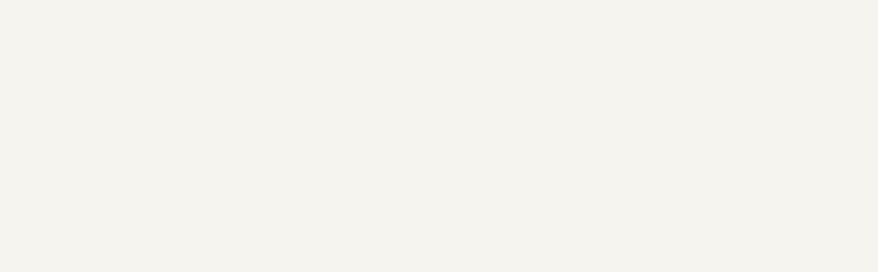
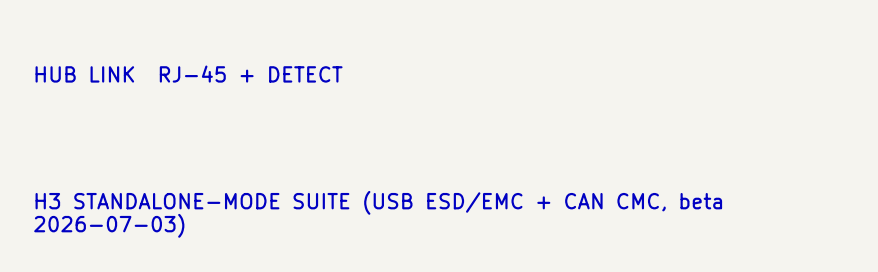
text: none -> HUB LINK RJ-45 + DETECT (189, 74)
text: none -> H3 STANDALONE-MODE SUITE (USB ESD/EMC + CAN CMC, beta (378, 202)
text: none -> 2026-07-03) (109, 225)

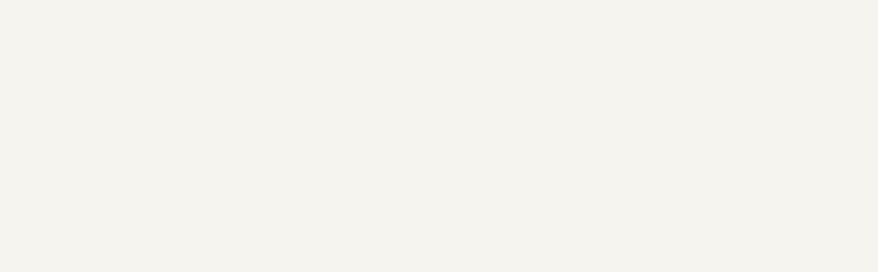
text: HUB LINK RJ-45 + DETECT (189, 74) -> none
text: H3 STANDALONE-MODE SUITE (USB ESD/EMC + CAN CMC, beta (378, 202) -> none
text: 2026-07-03) (109, 225) -> none

